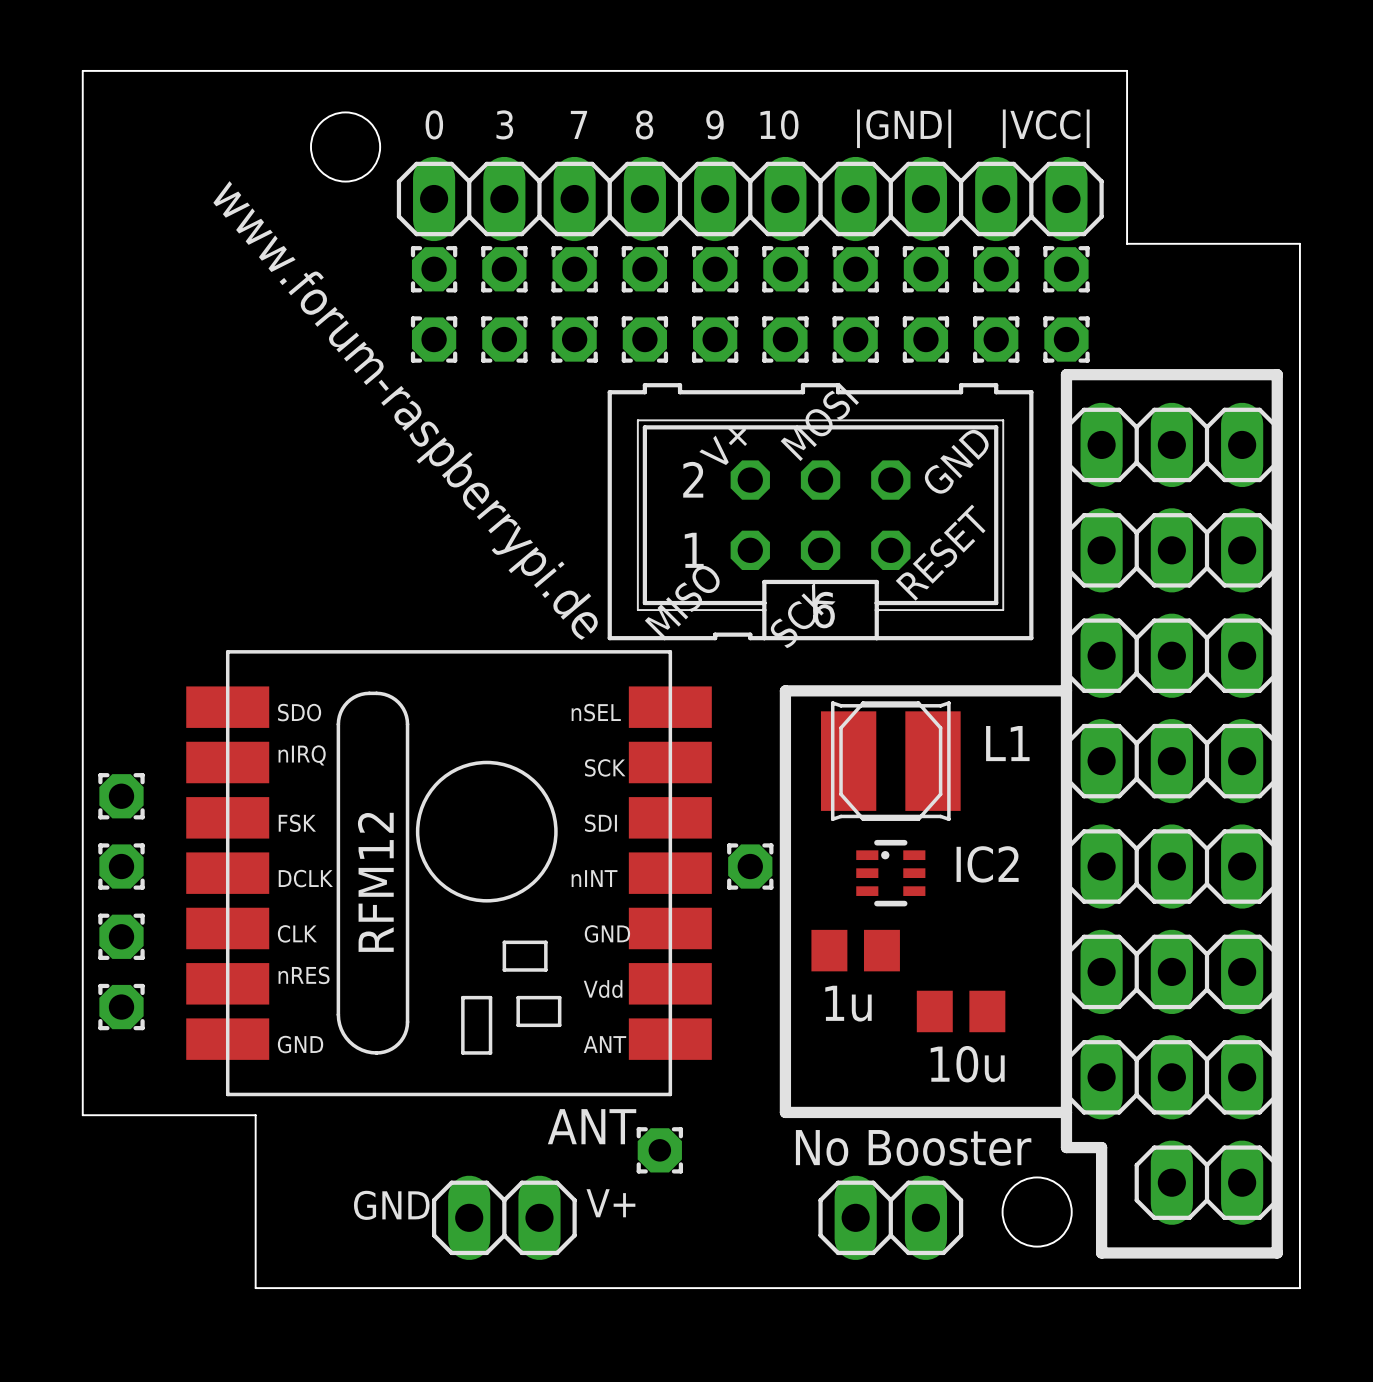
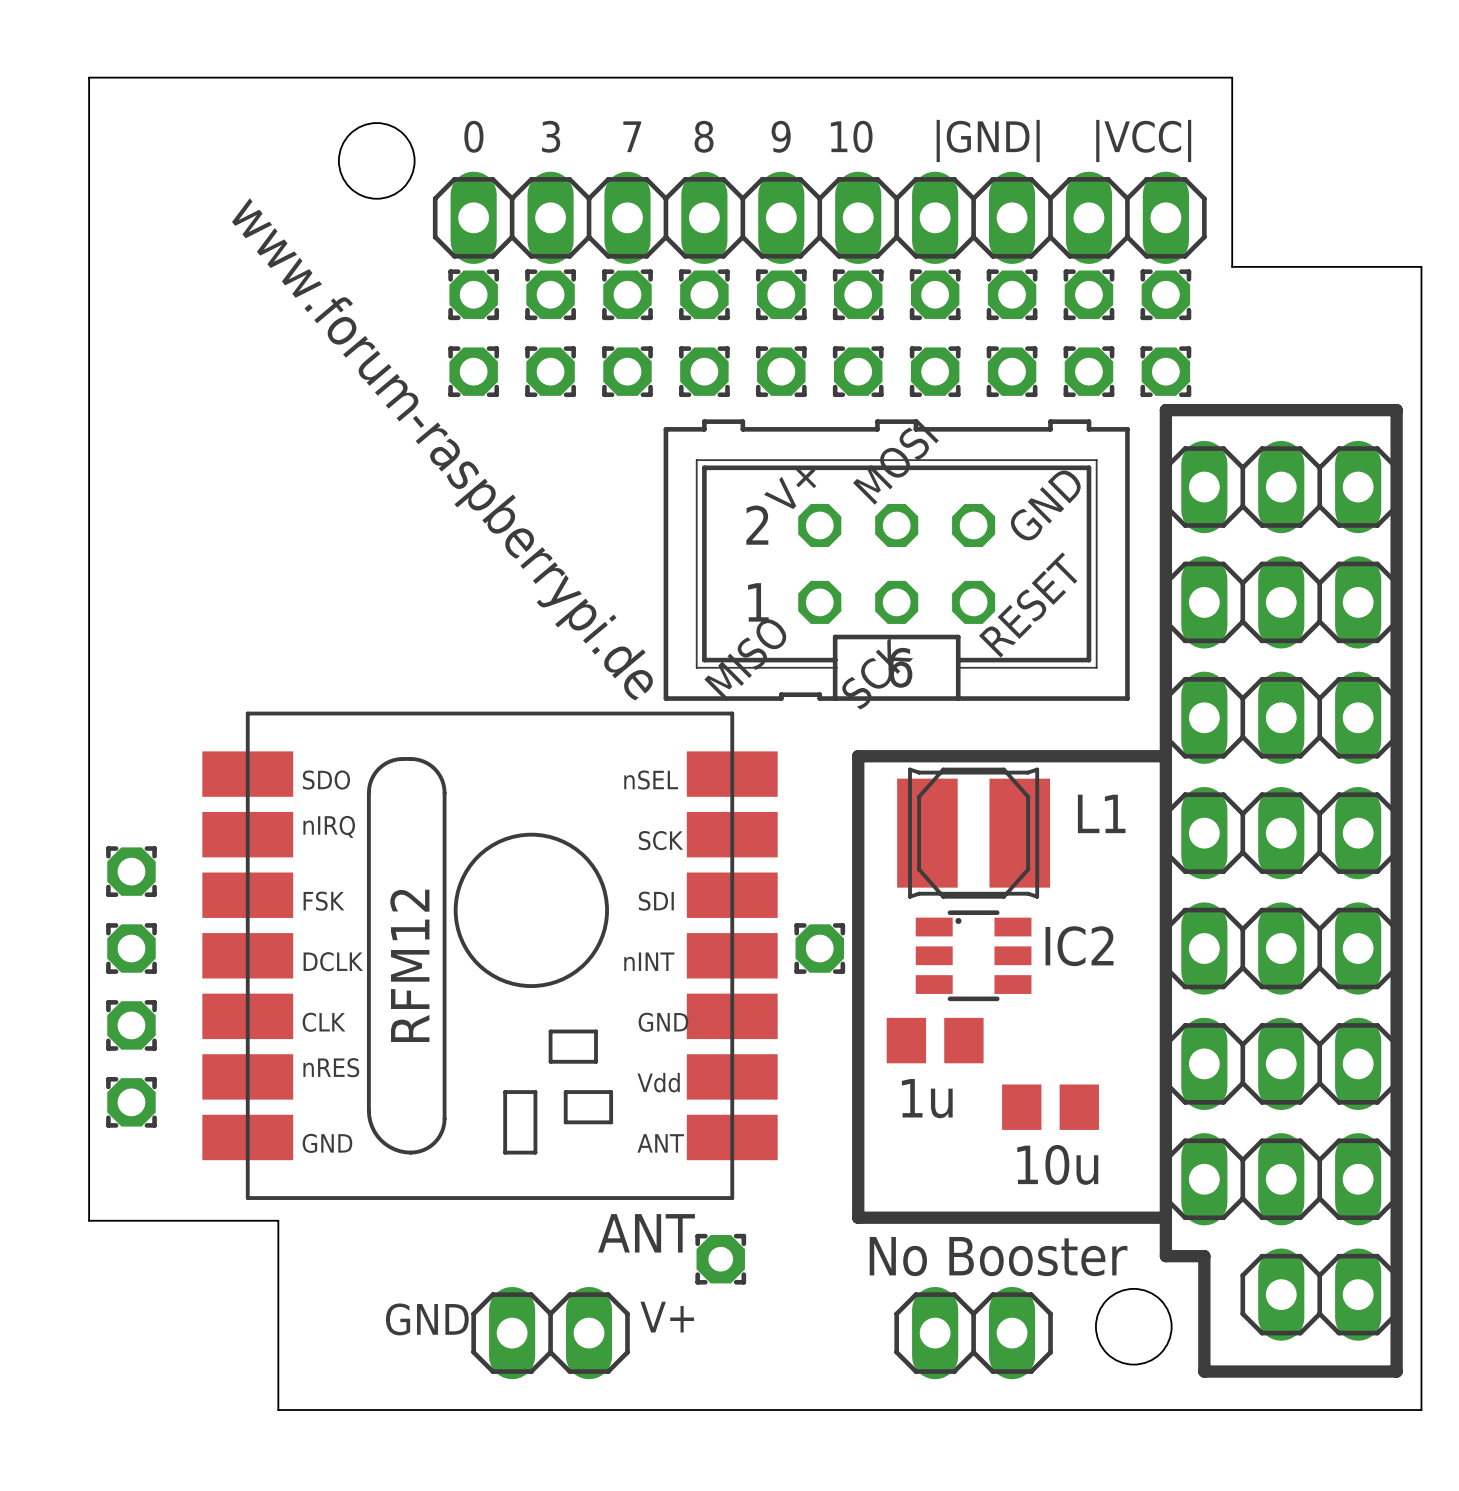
part footprint: [856, 839, 926, 907] -> [915, 910, 1032, 1002]

